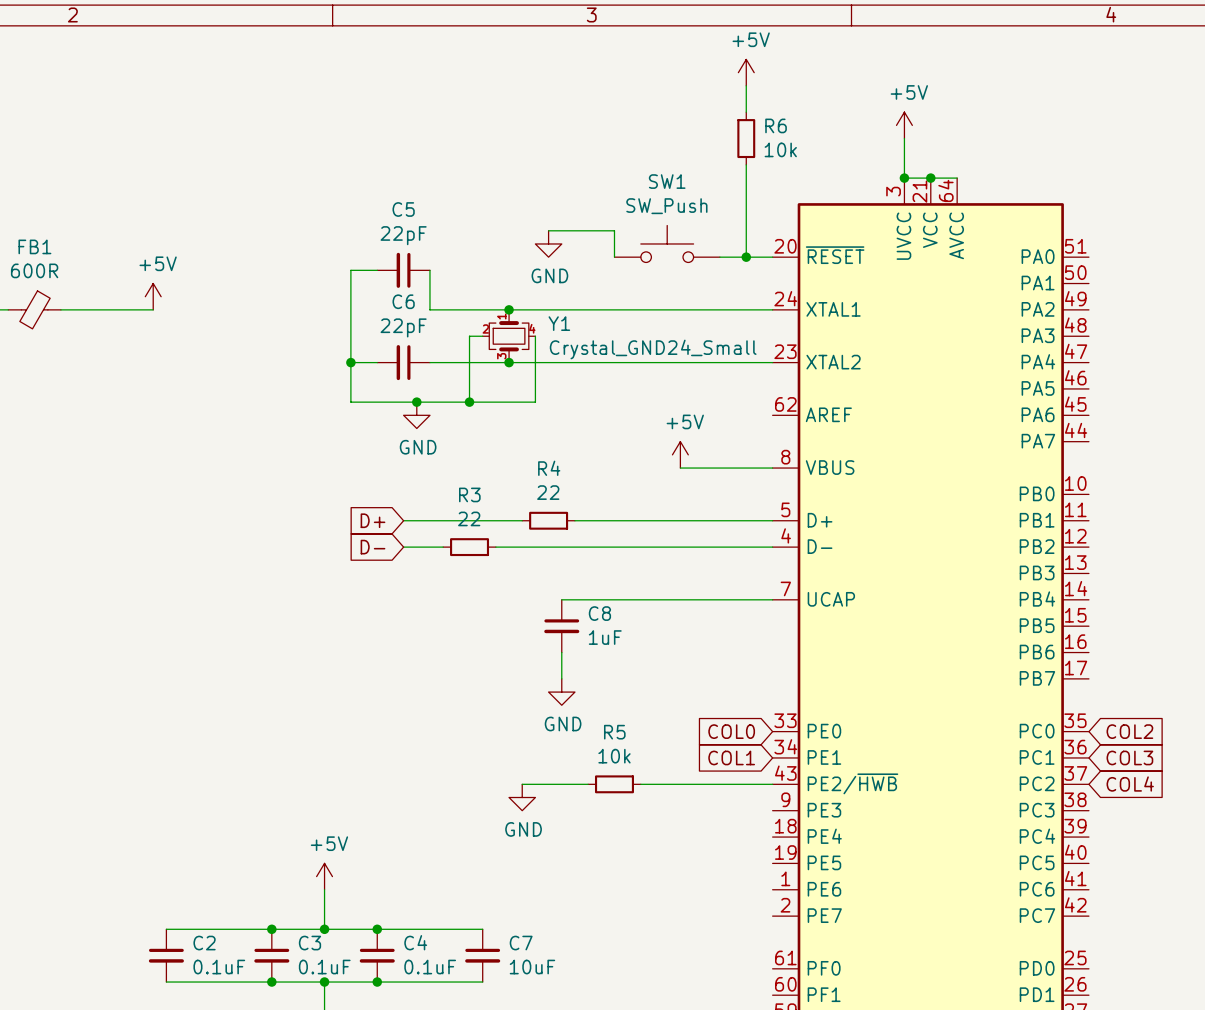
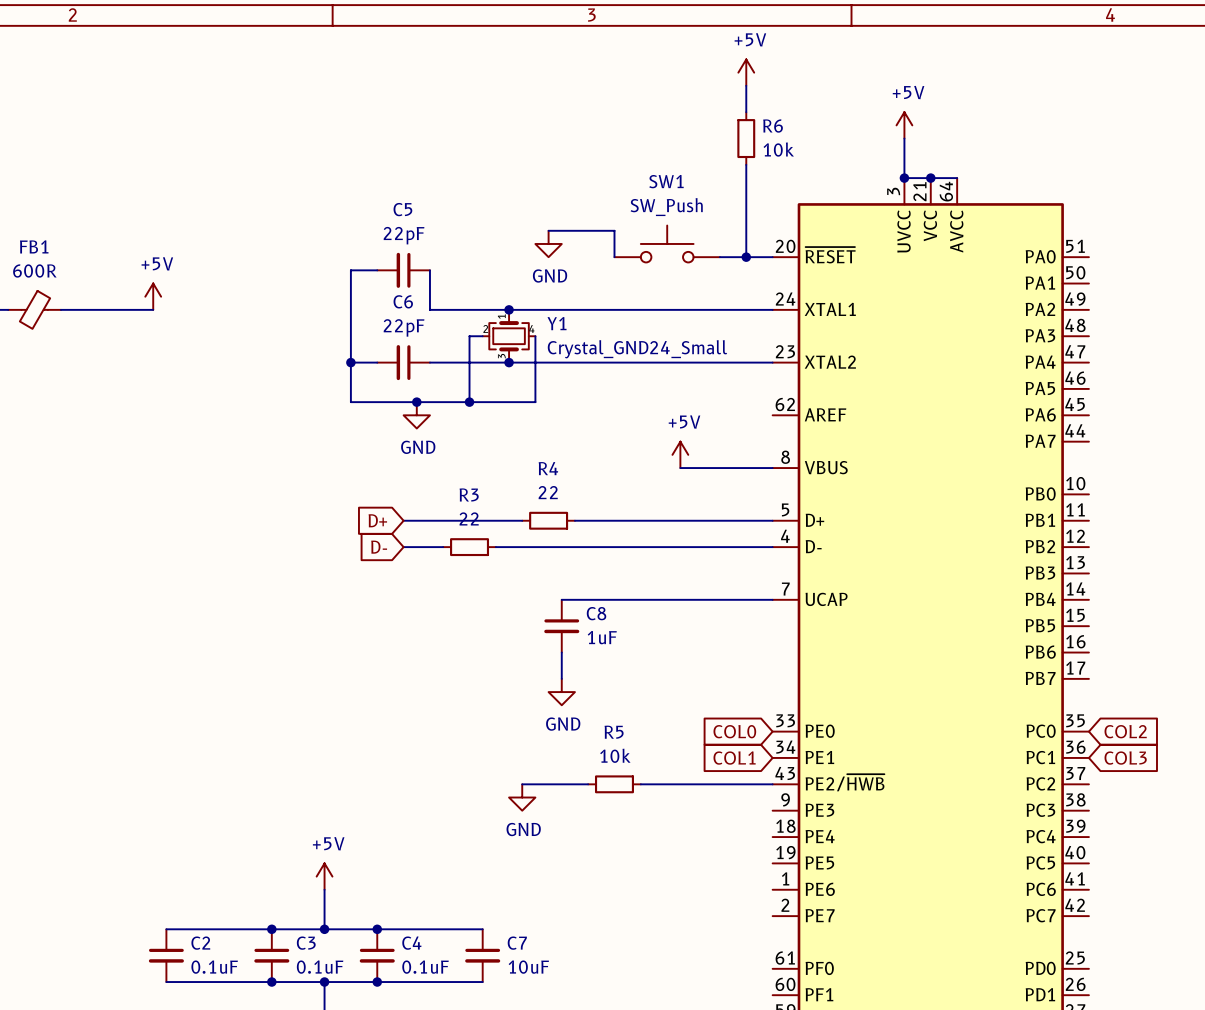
global label: COL4 (1130, 784) -> none

